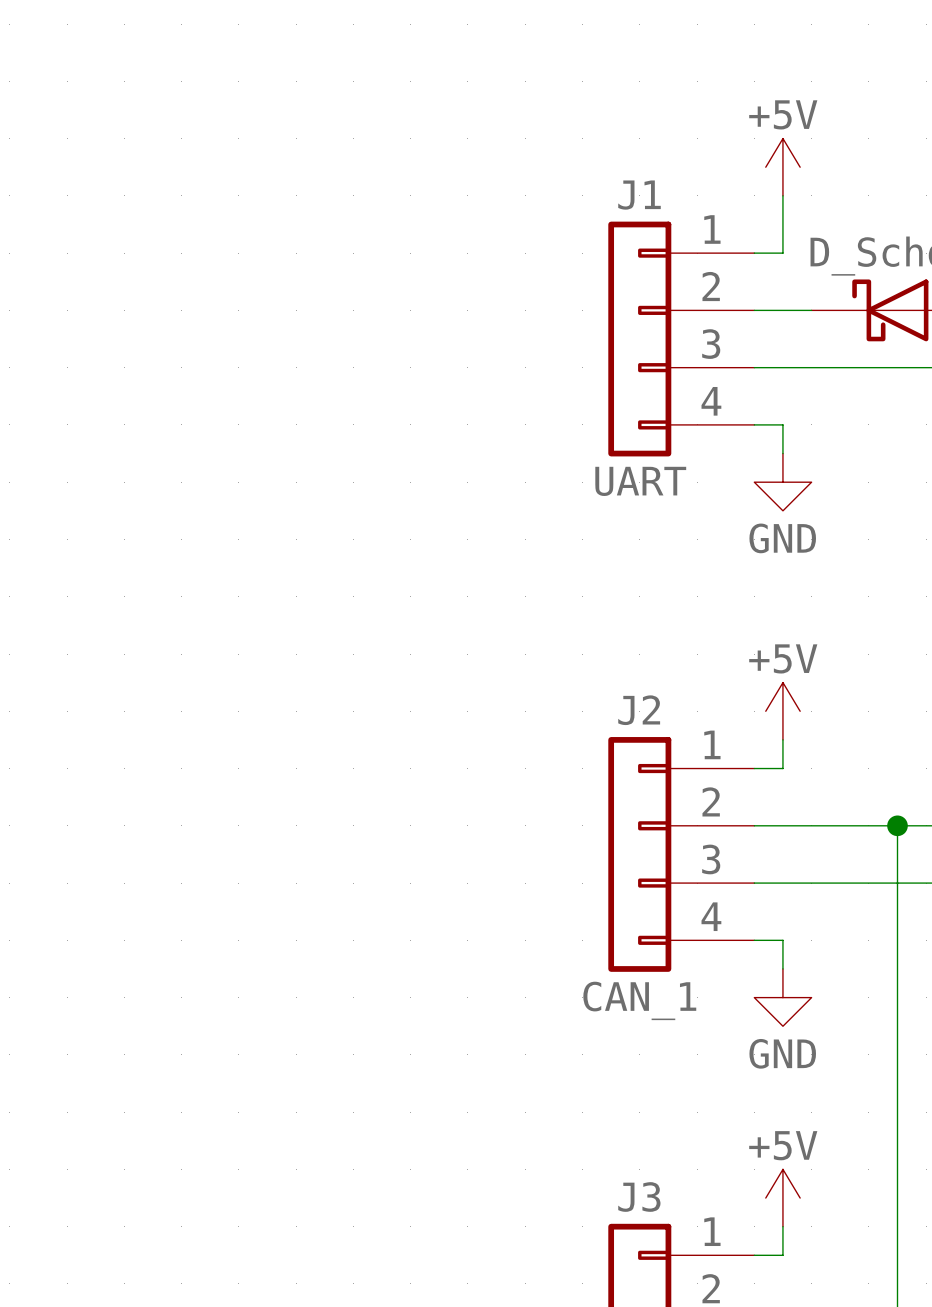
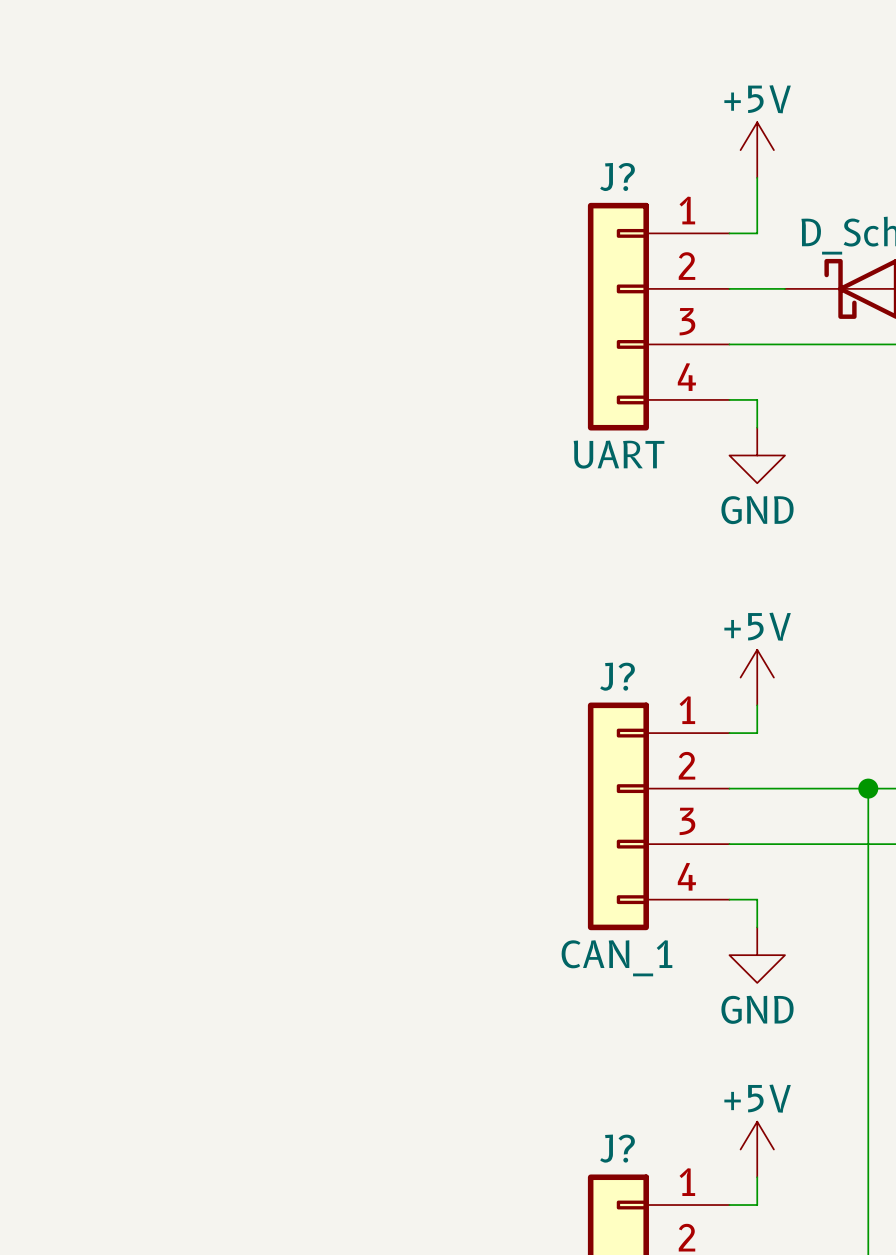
J1 name: J1 (639, 195) -> J? (617, 176)
J2 name: J2 (639, 710) -> J? (617, 676)
J3 name: J3 (639, 1196) -> J? (617, 1148)

